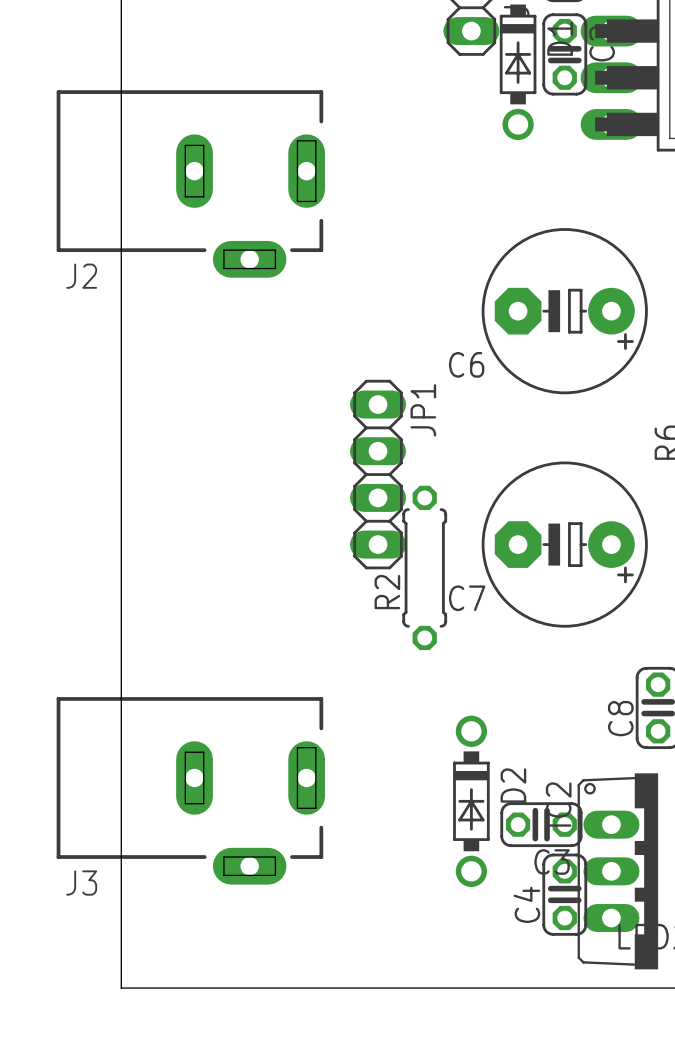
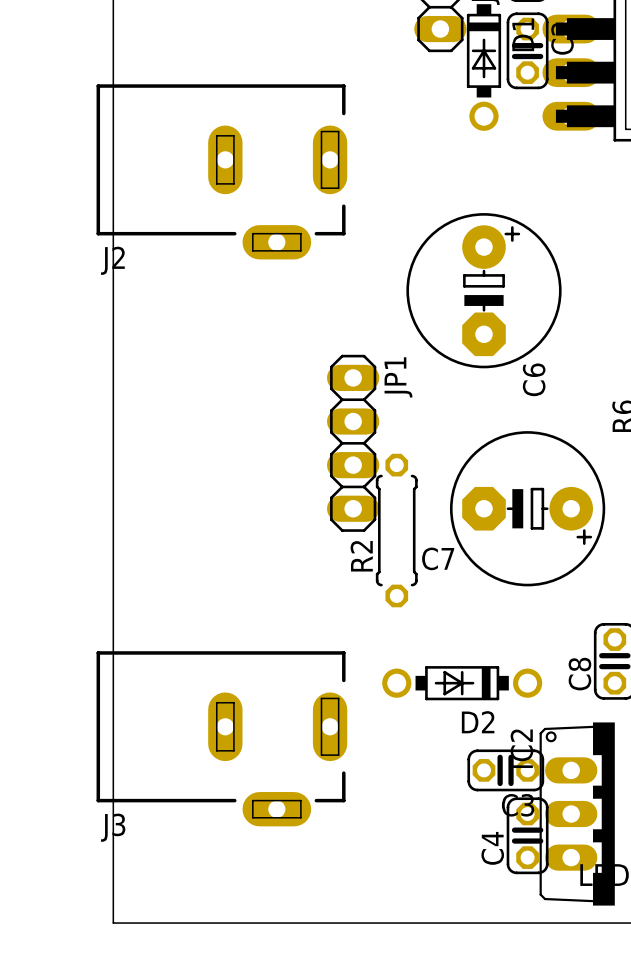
J2 position: (190, 183) -> (221, 171)
C6 rotation: 0° (564, 311) -> 90° counterclockwise (483, 290)
J3 position: (190, 790) -> (221, 738)
D2 rotation: 0° (471, 801) -> 90° clockwise (462, 683)

